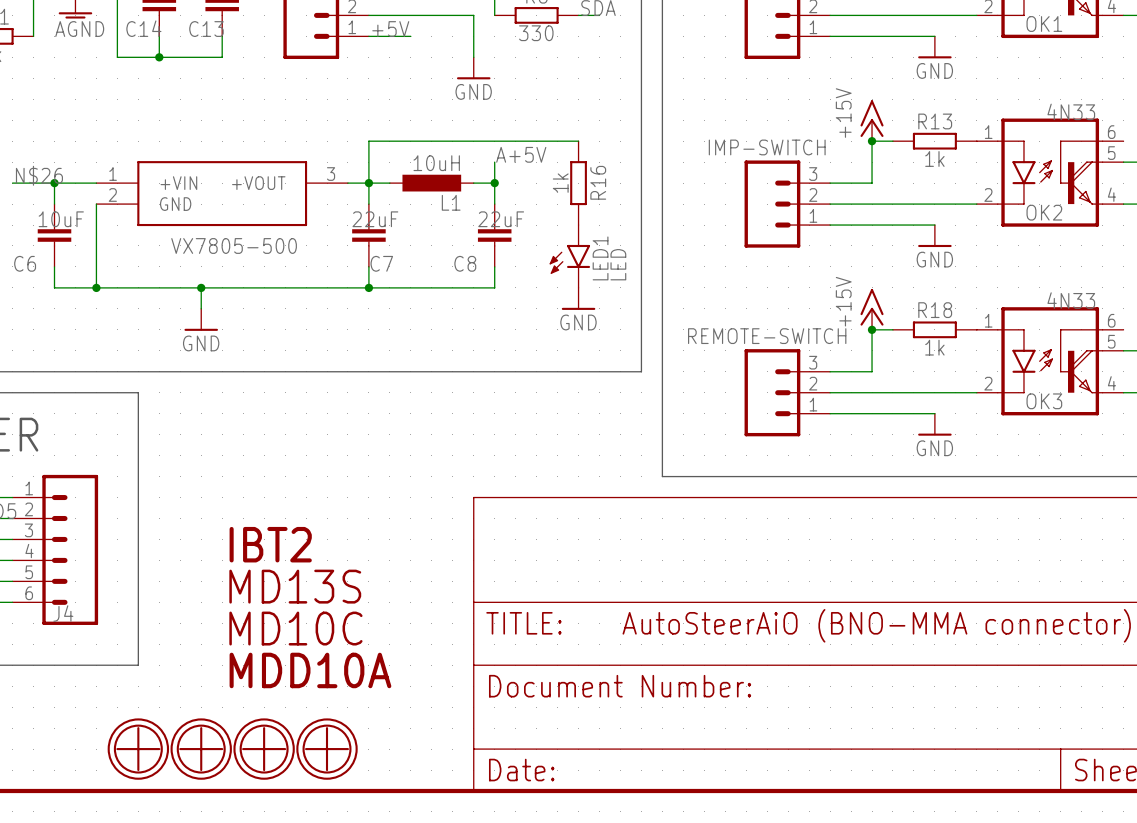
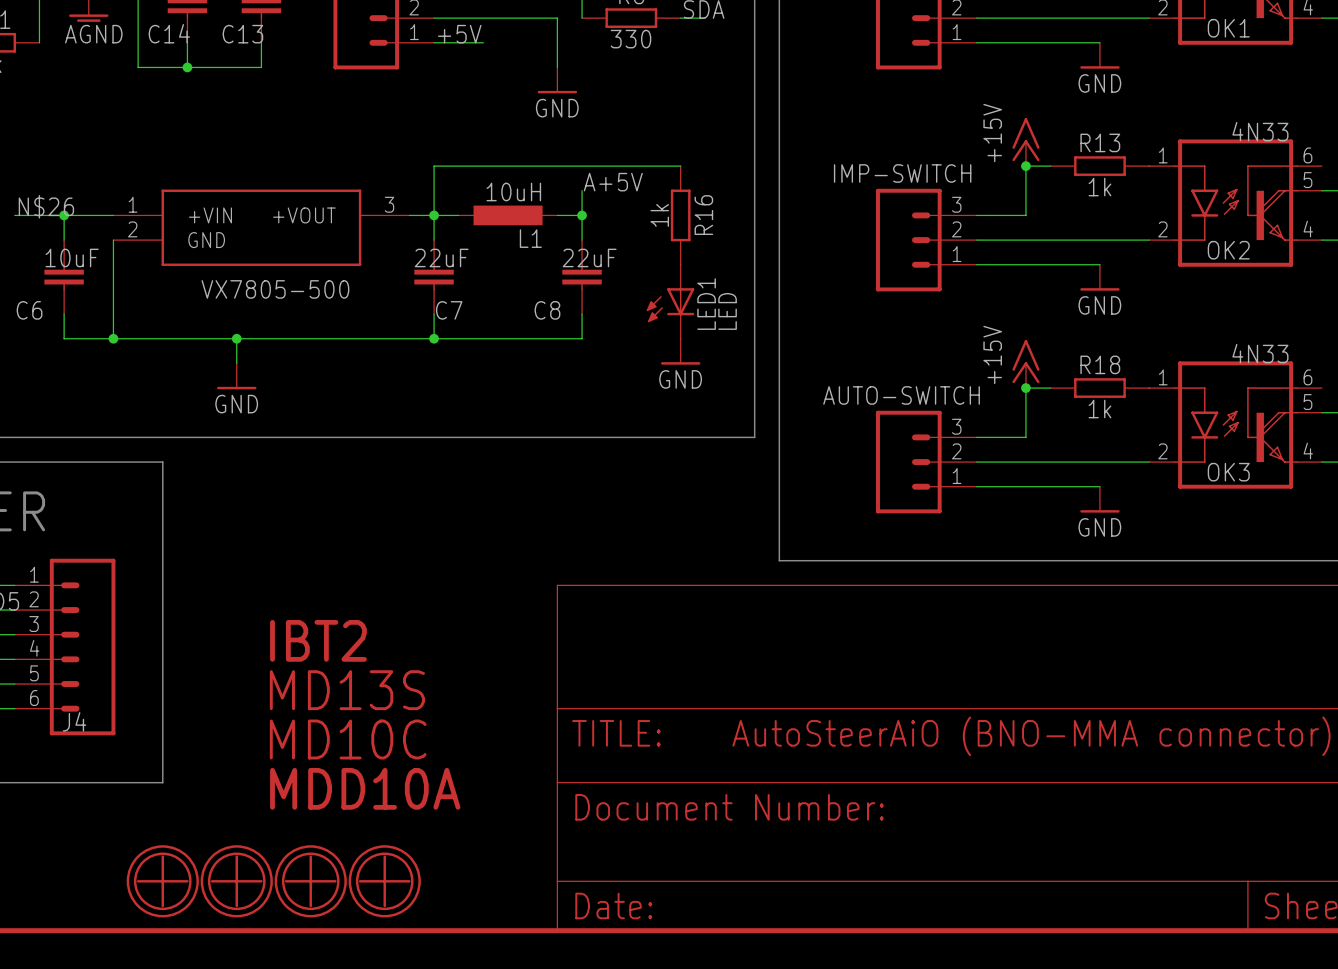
LED1 symbol: [549, 225, 591, 288] -> [646, 264, 695, 339]
REMOTE-SWITCH name: REMOTE-SWITCH (767, 336) -> AUTO-SWITCH (901, 395)

